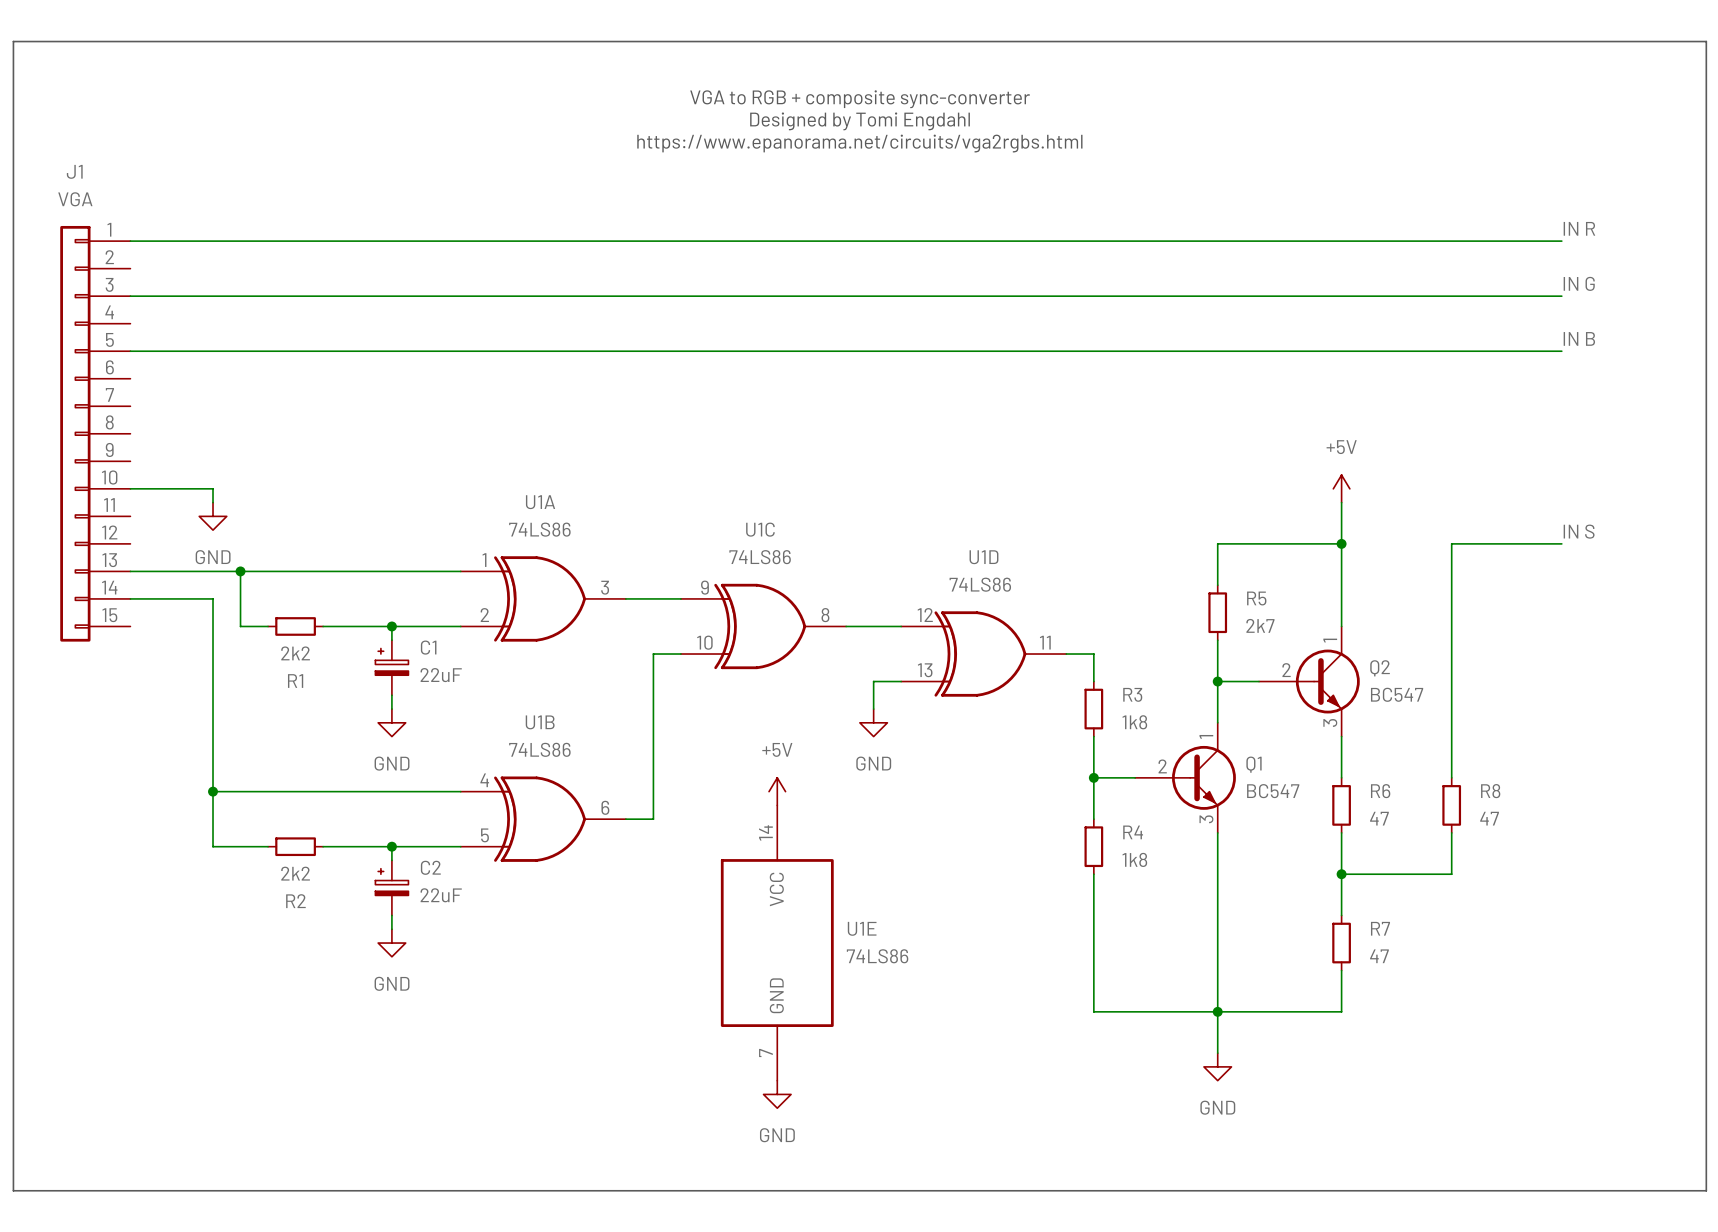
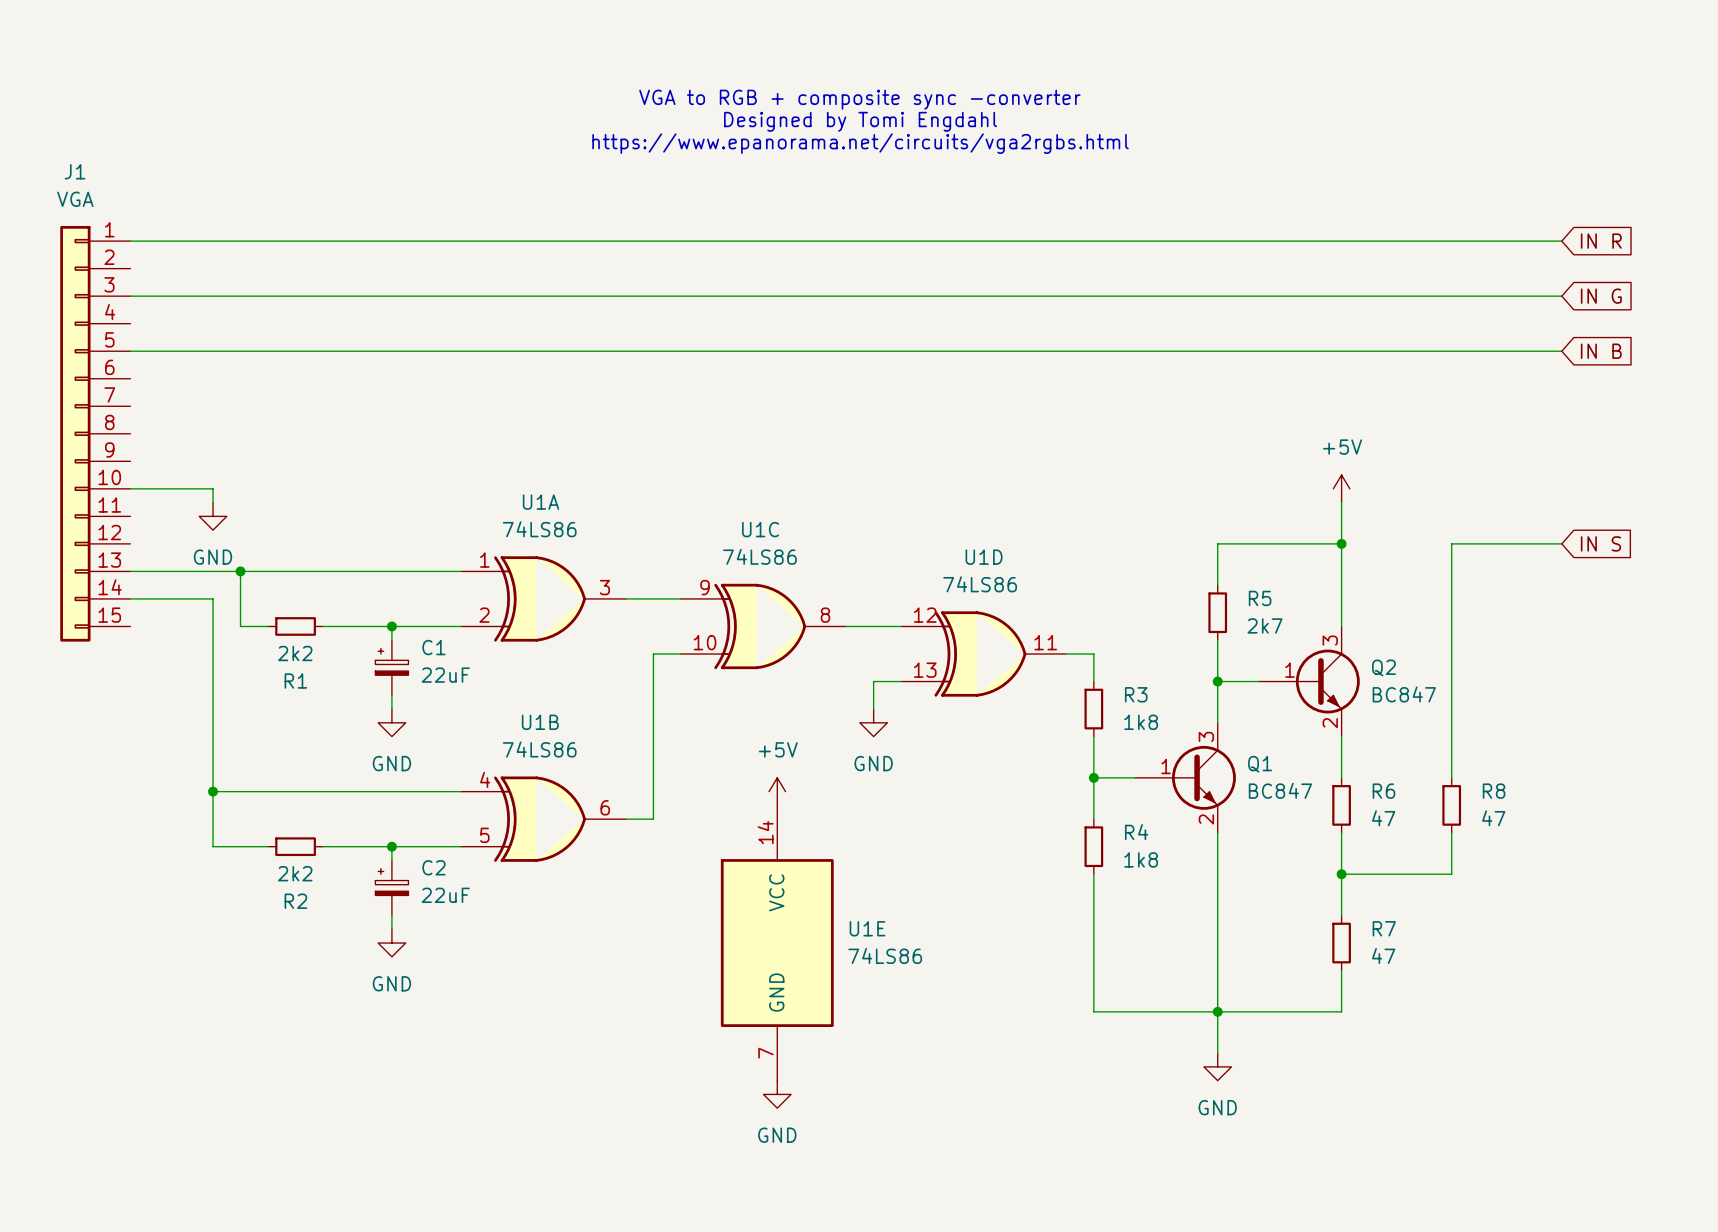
line: (13, 41) (1706, 41) (1706, 1190) (13, 1190) (13, 41) -> none
text: VGA to RGB + composite sync-converter (860, 99) -> VGA to RGB + composite sync -converter (859, 99)
label: IN R (1579, 228) -> none
global label: none -> IN R (1601, 241)
label: IN G (1579, 283) -> none
global label: none -> IN G (1601, 296)
label: IN B (1579, 338) -> none
global label: none -> IN B (1601, 351)
label: IN S (1579, 531) -> none
global label: none -> IN S (1600, 543)
Q2 symbol: [1259, 626, 1360, 737] -> [1259, 626, 1360, 737]
Q2 value: BC547 (1397, 694) -> BC847 (1404, 694)
Q1 symbol: [1135, 722, 1236, 833] -> [1135, 722, 1236, 833]
Q1 value: BC547 (1273, 791) -> BC847 (1280, 790)

